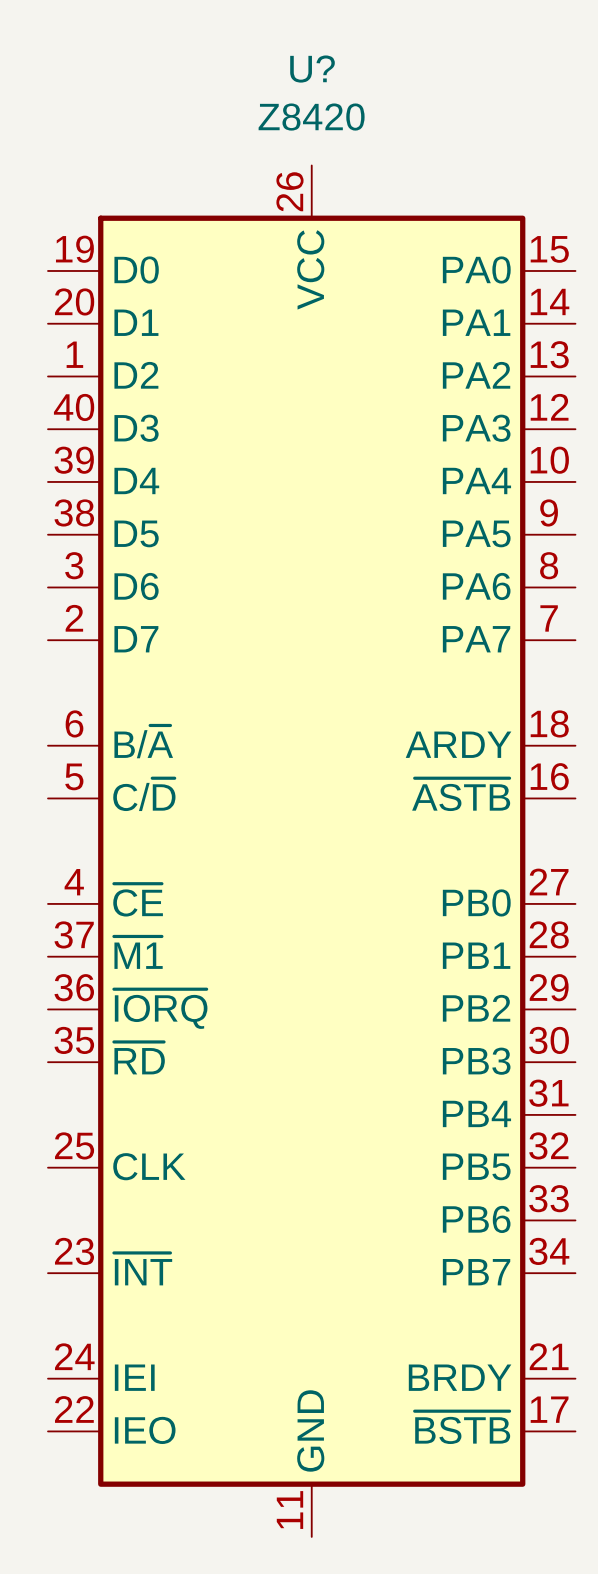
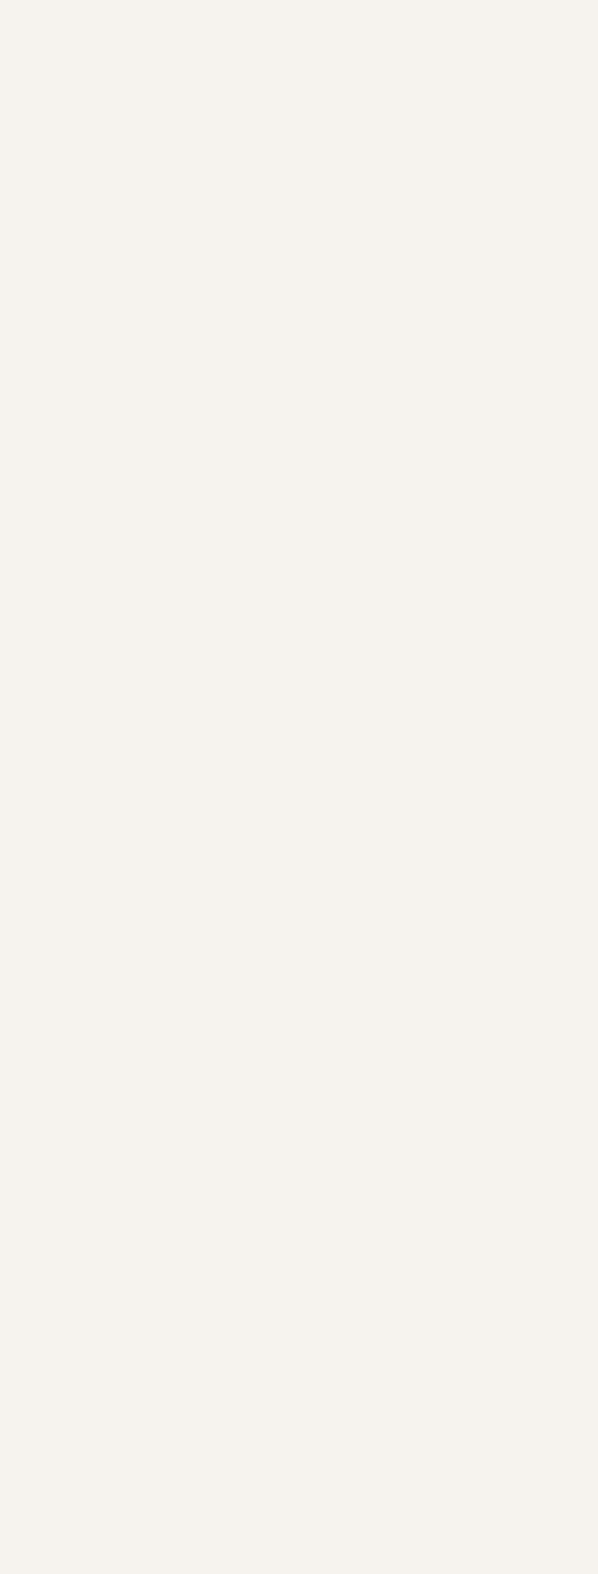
U?: Z8420 (311, 851) -> none

